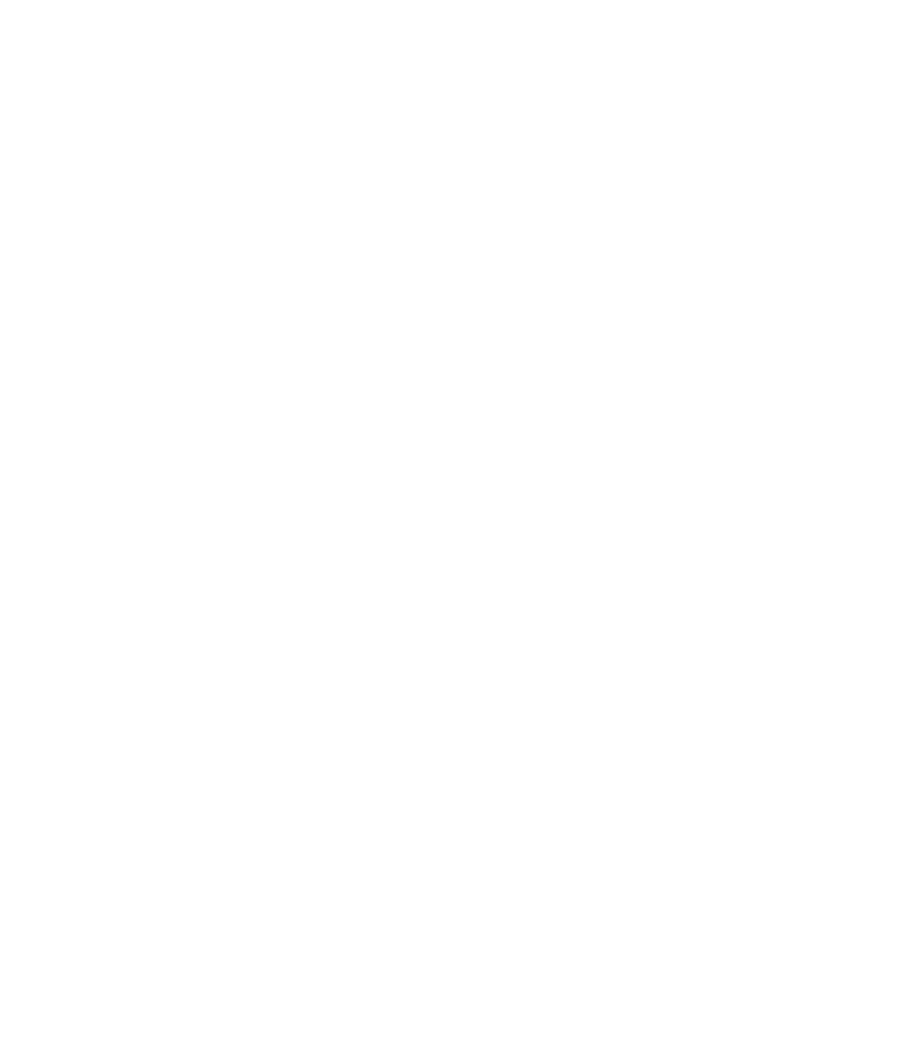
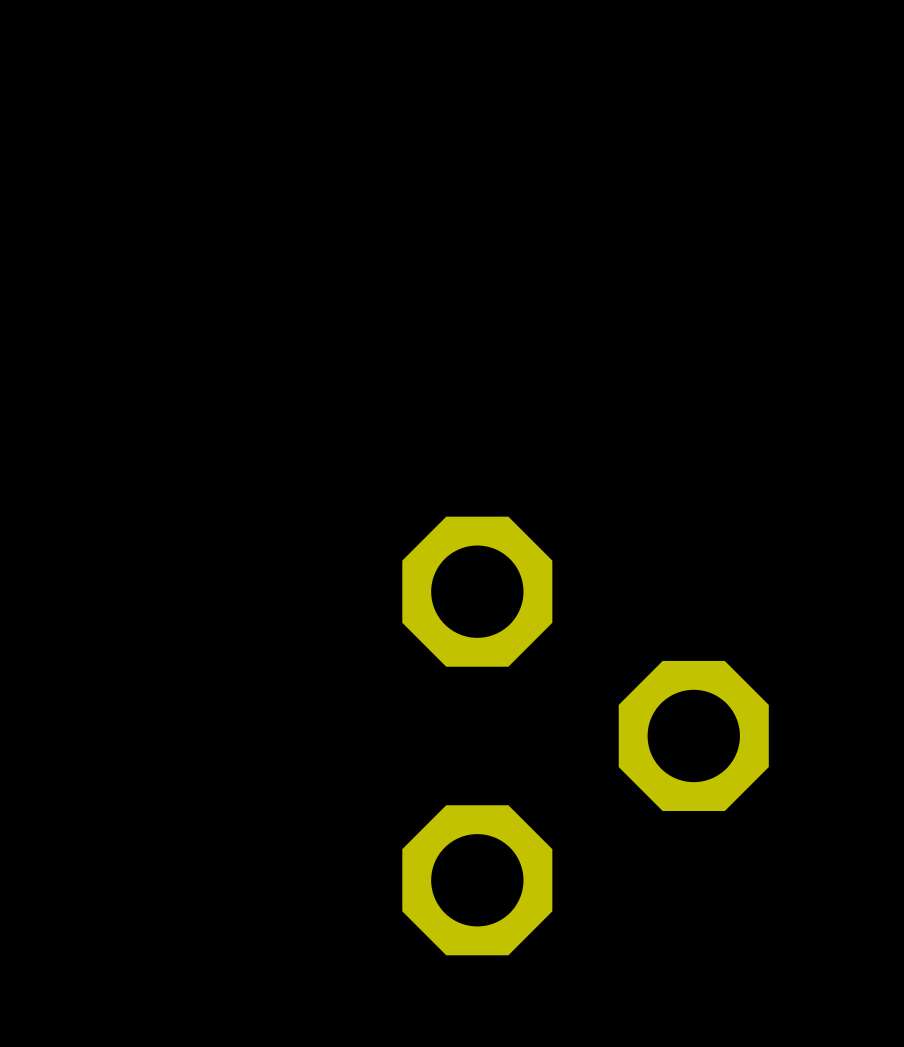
part: none -> (585, 735)

